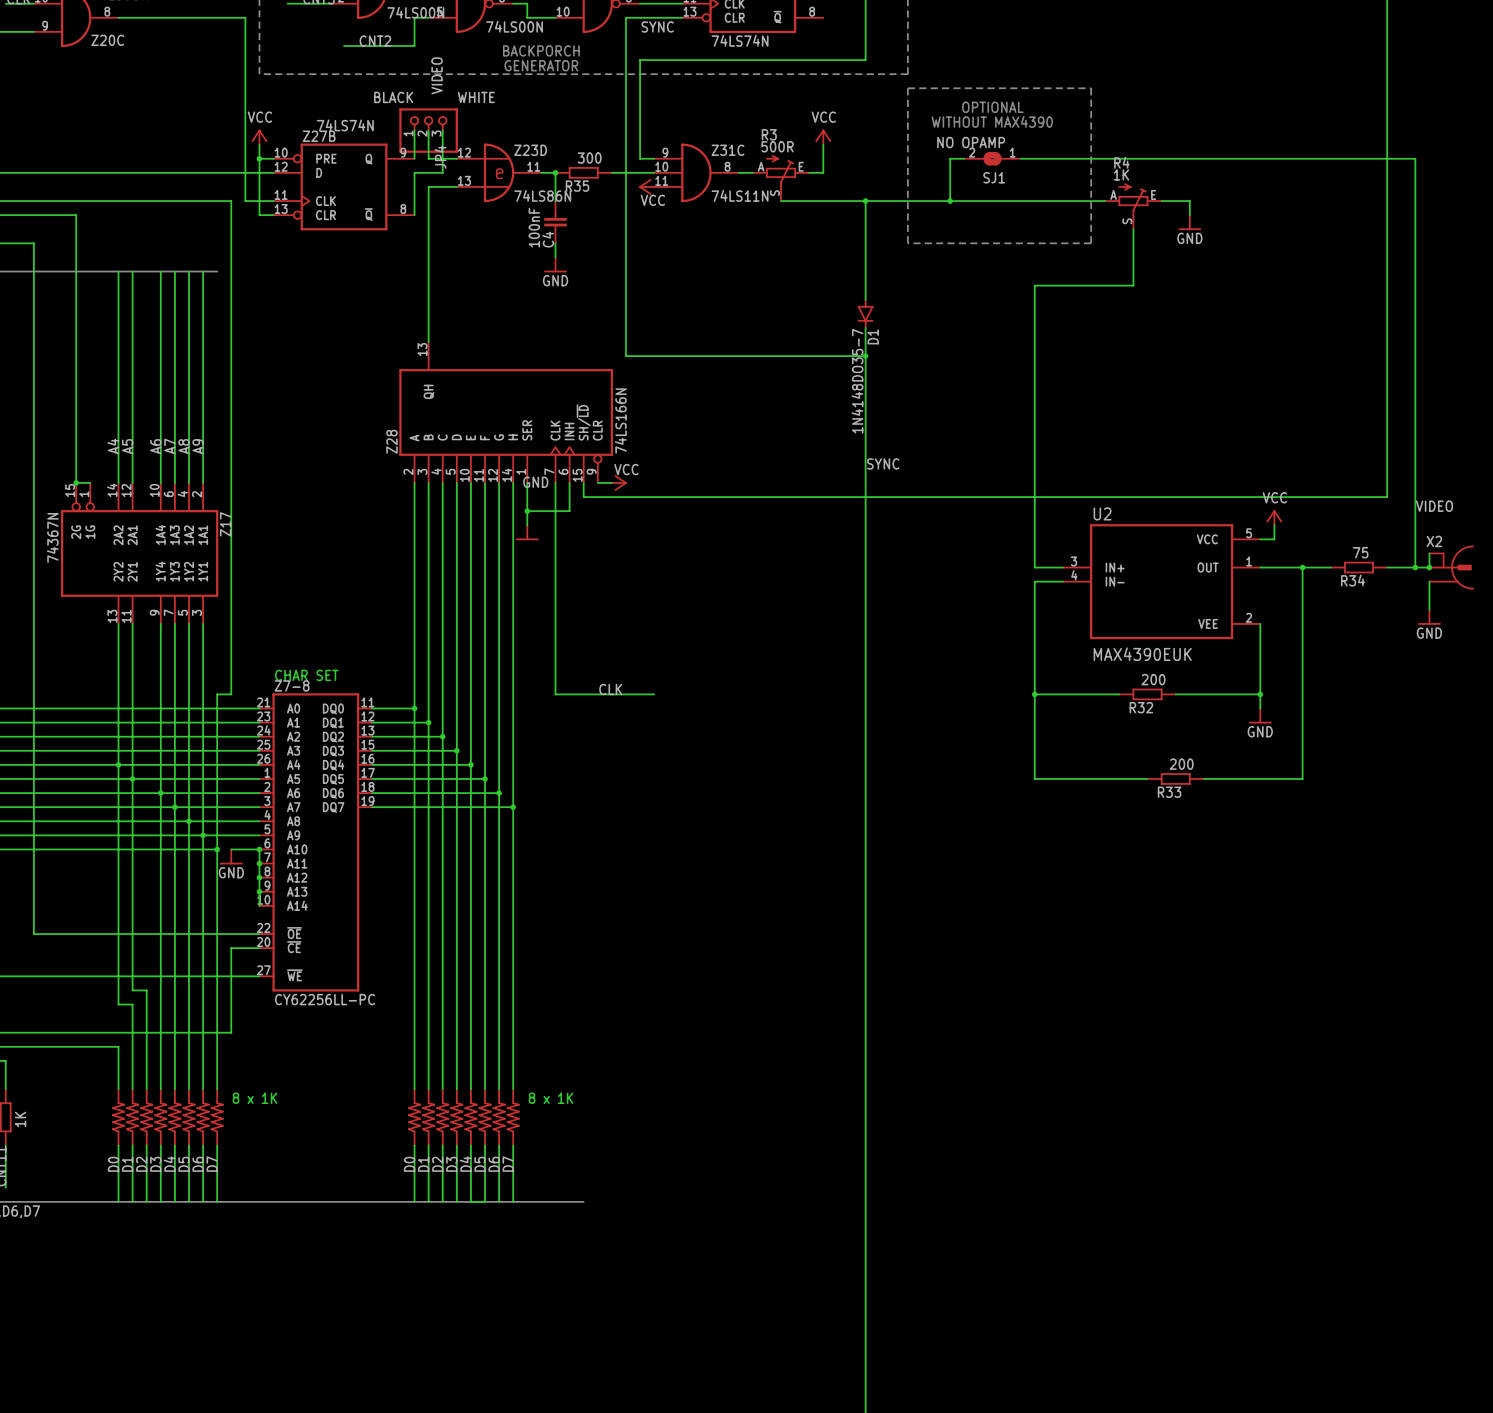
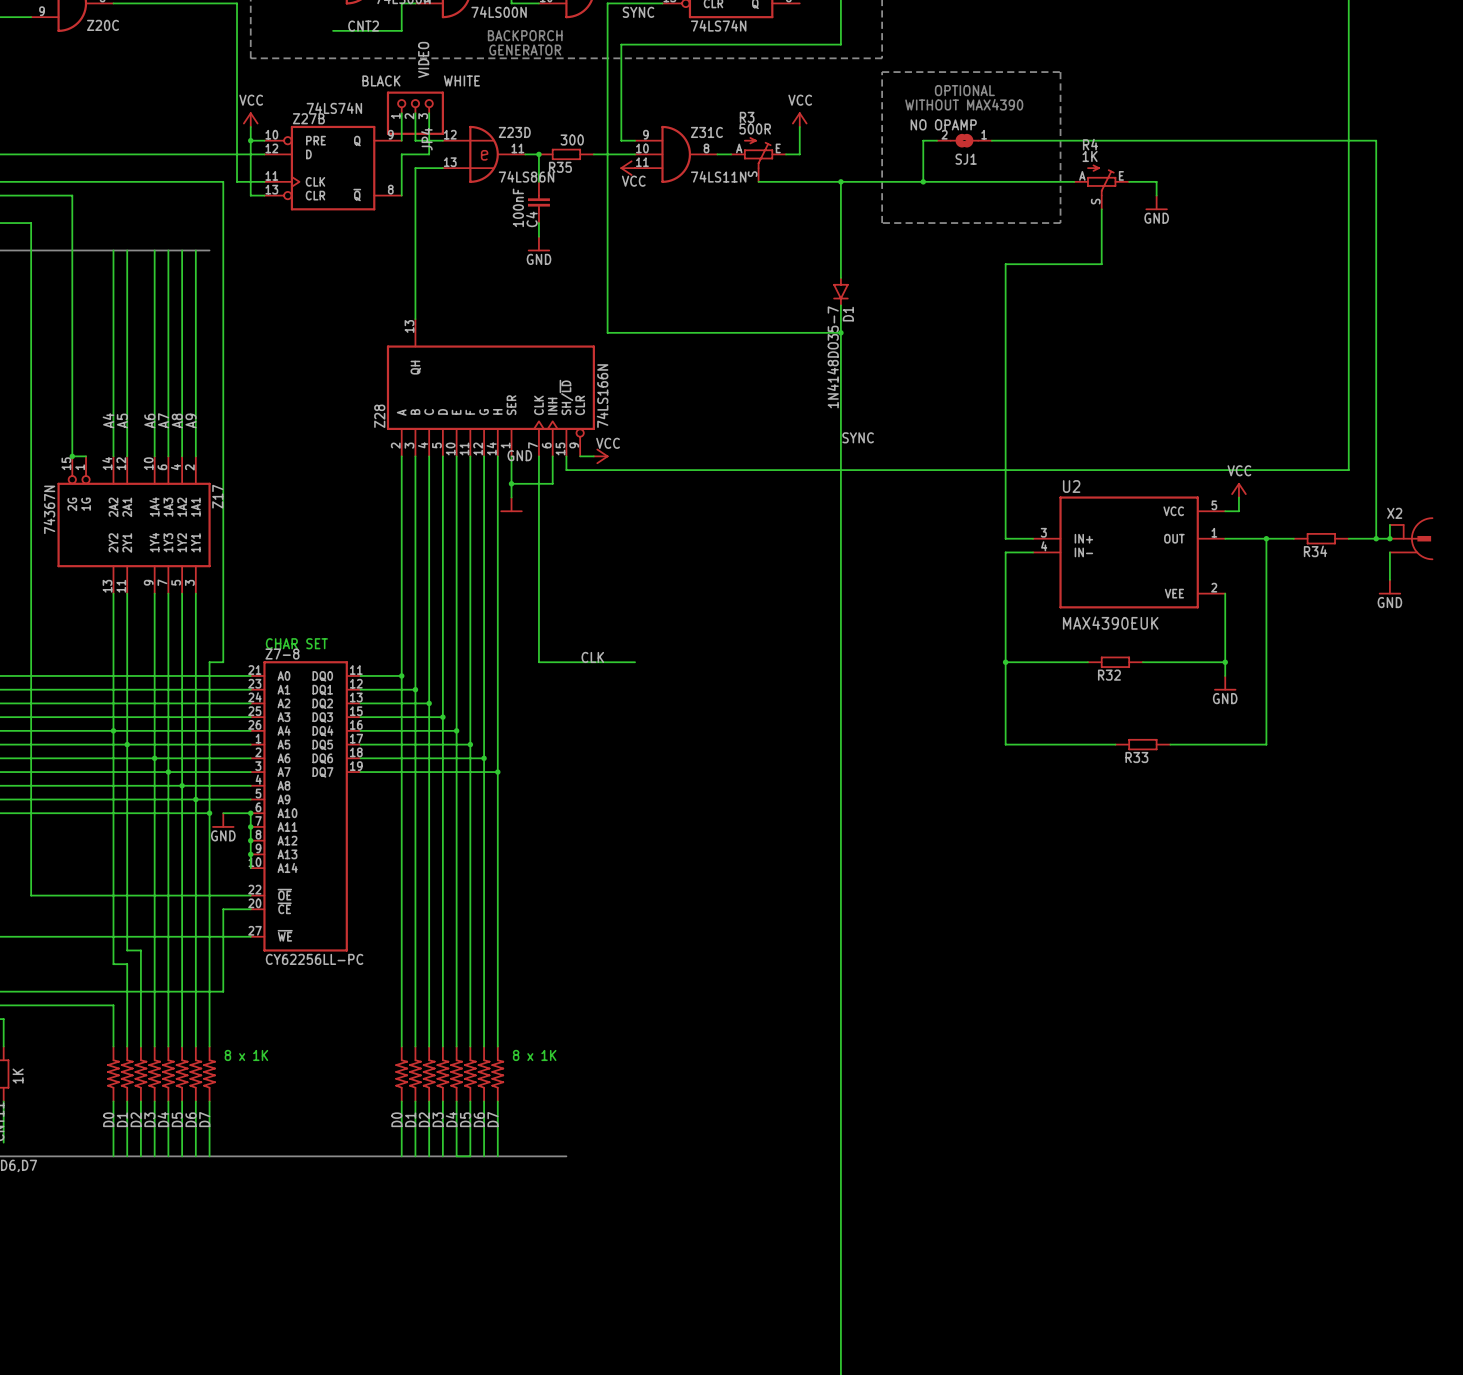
label: VIDEO (1434, 506) -> none
R34 value: 75 (1360, 552) -> none
R32 value: 200 (1153, 679) -> none
R33 value: 200 (1181, 764) -> none

